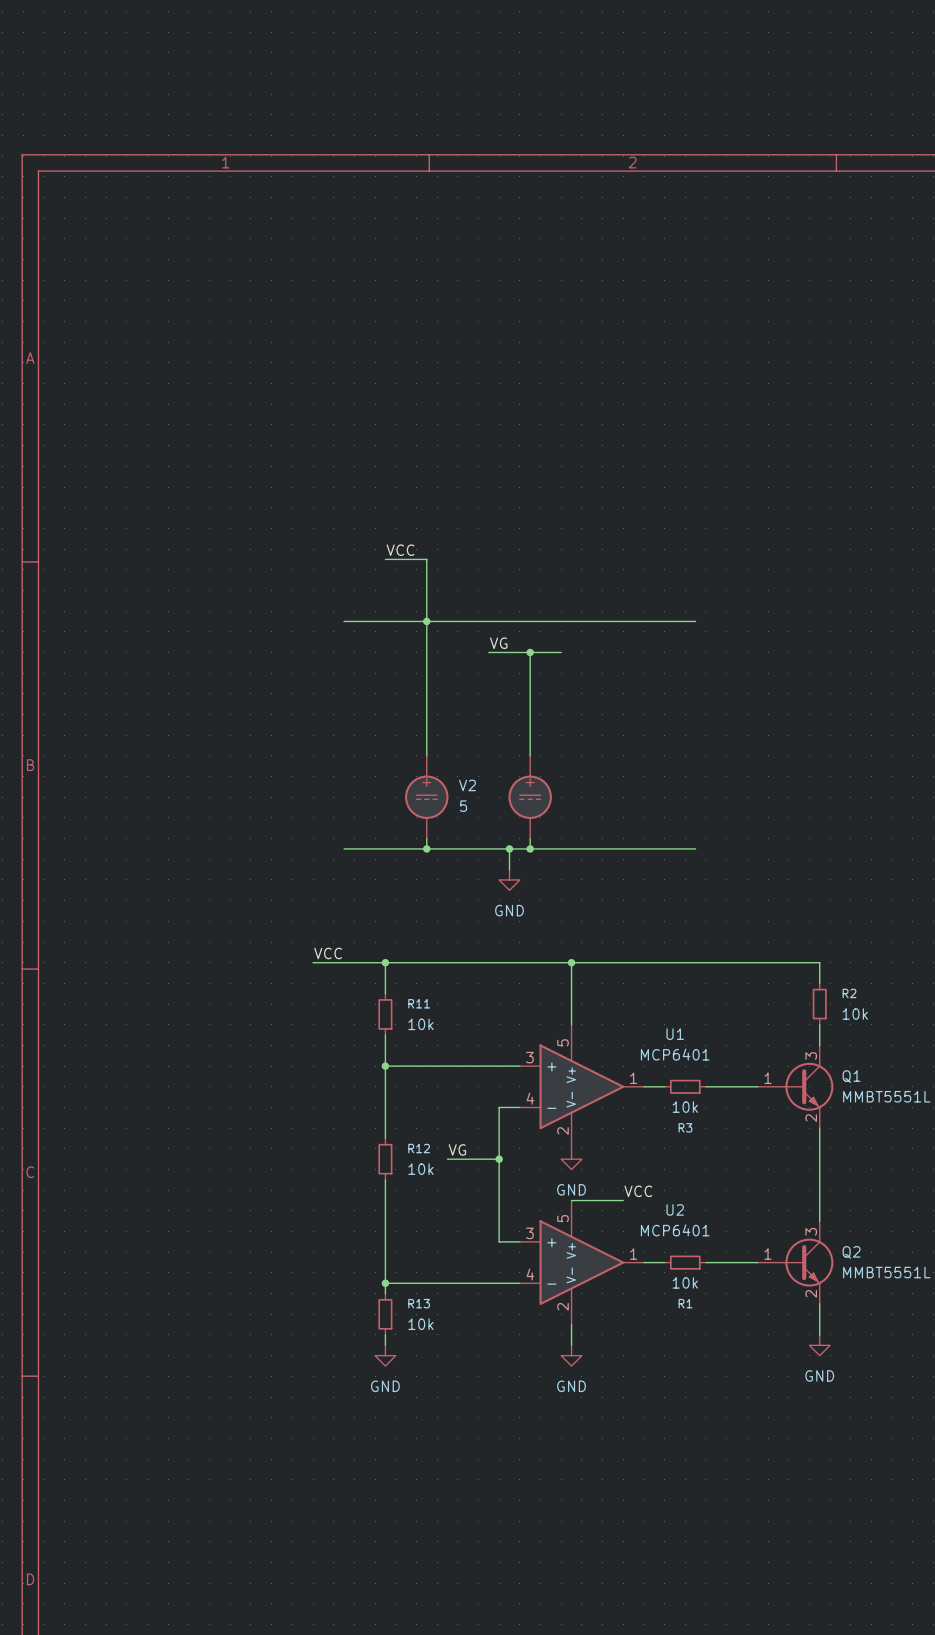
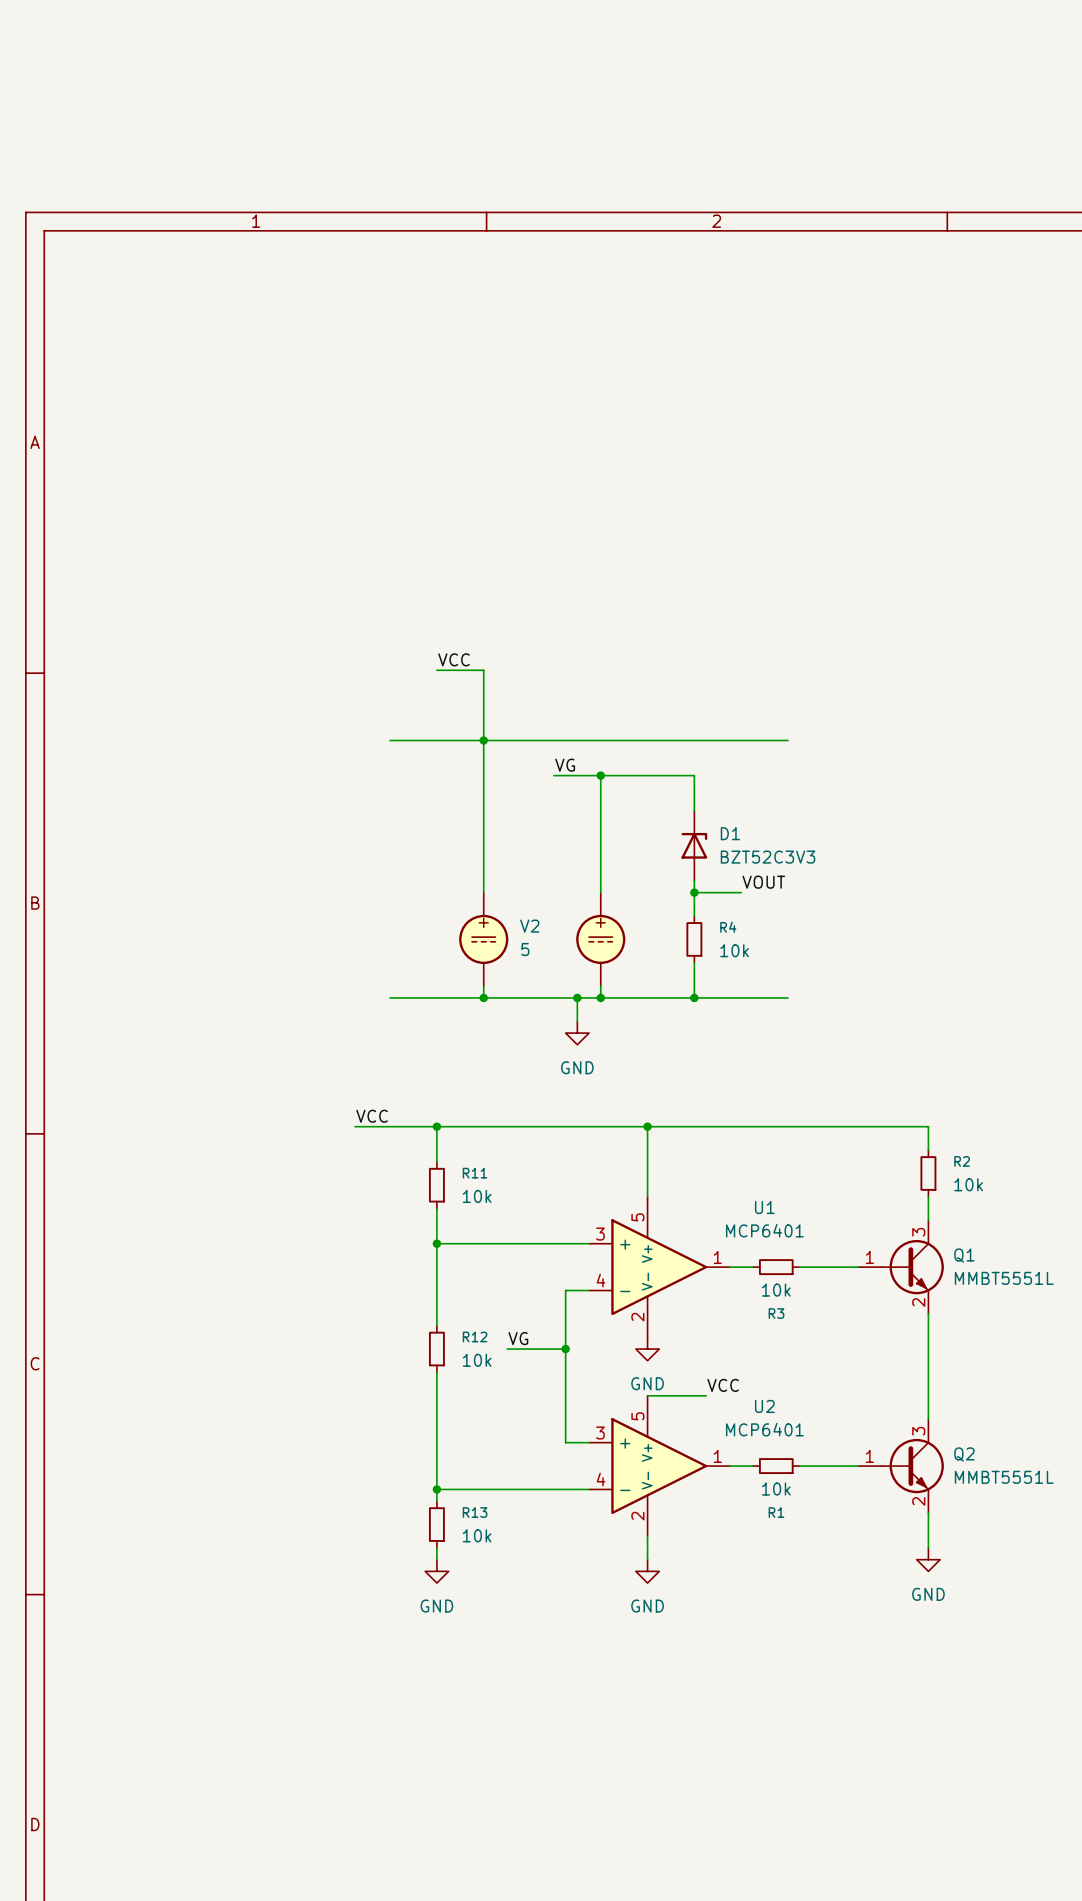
wire: none -> (635, 775) (694, 775) (694, 810)
D1: none -> BZT52C3V3 (694, 845)
wire: none -> (694, 880) (694, 916)
label: none -> VOUT (763, 882)
wire: none -> (694, 892) (741, 892)
junction: none -> (694, 892)
R4: none -> 10k (694, 939)
wire: none -> (694, 962) (694, 997)
junction: none -> (694, 997)

